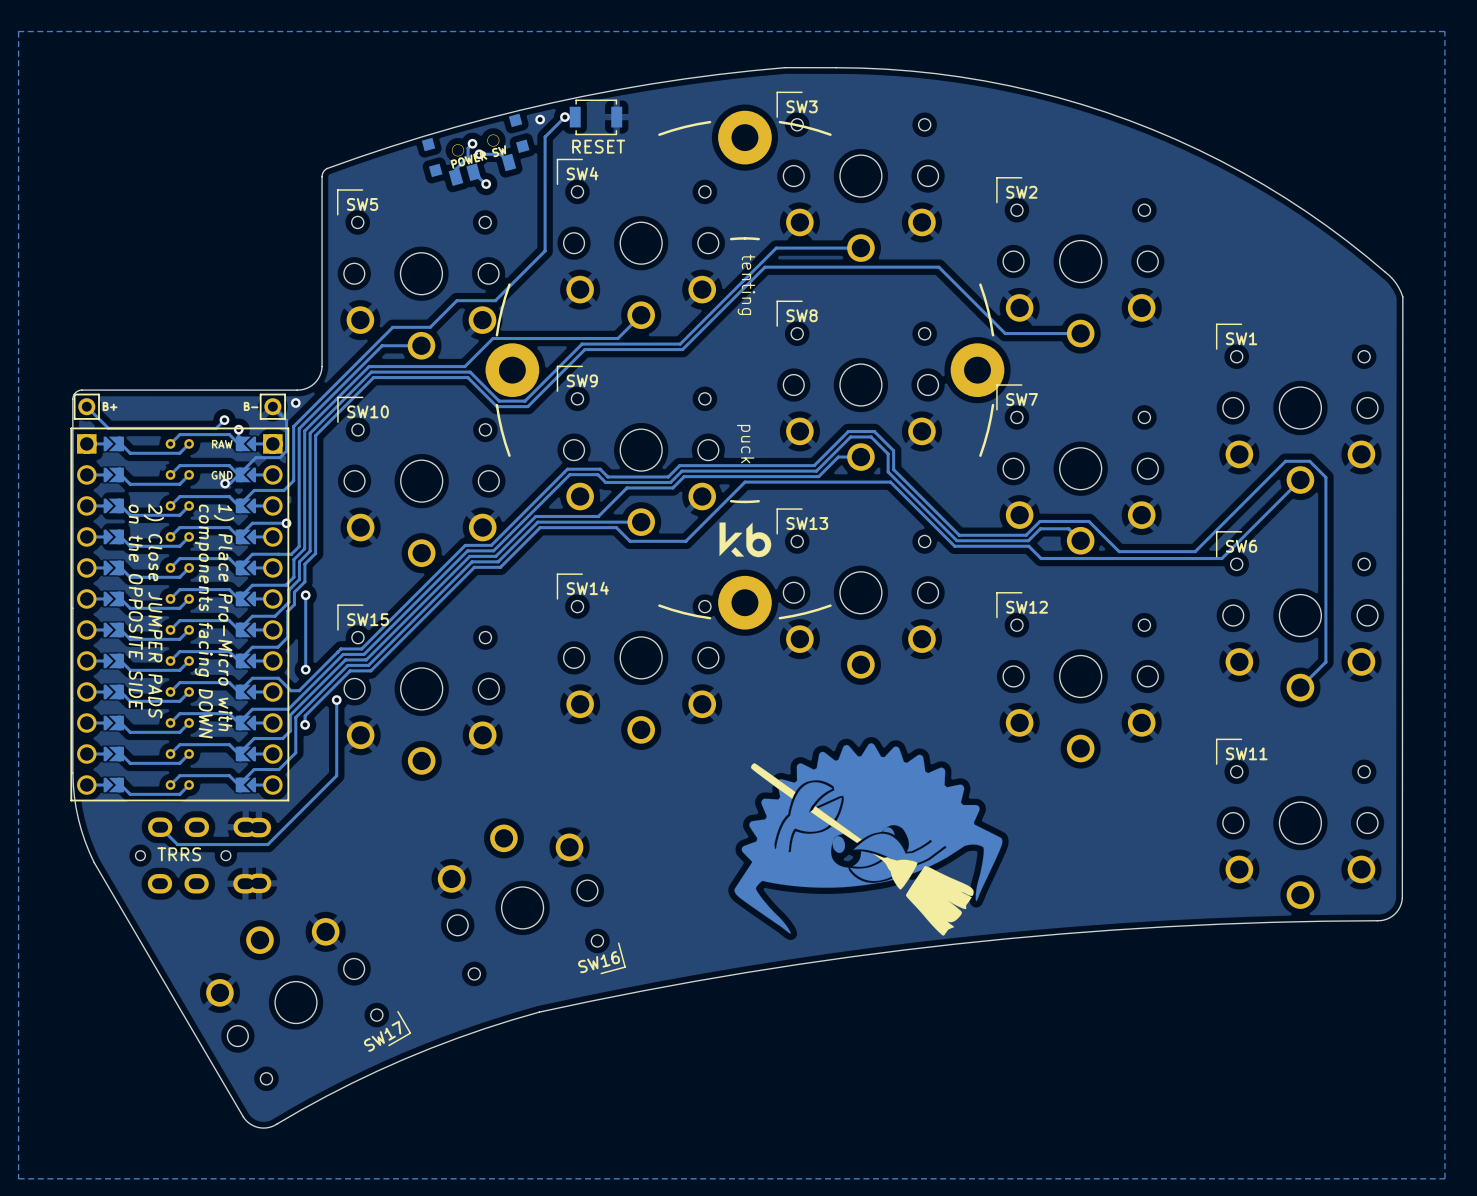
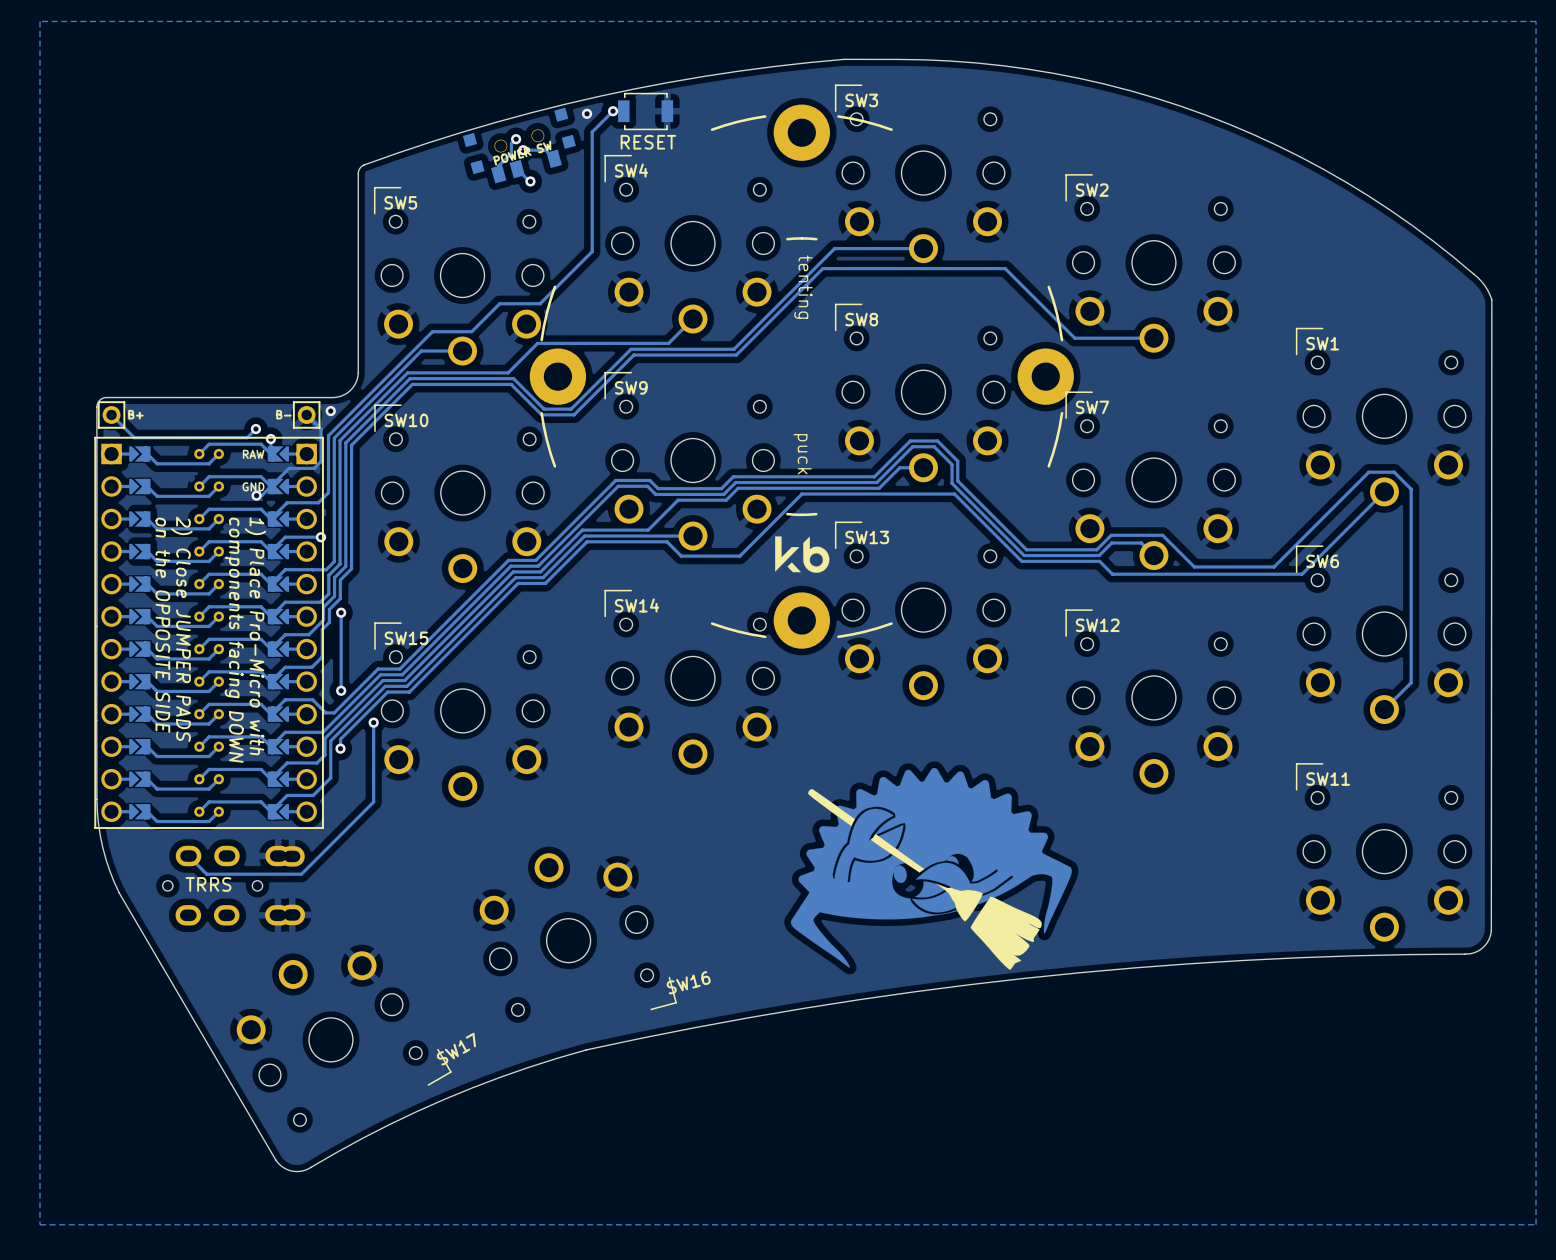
SW16 name position: SW16 (599, 962) -> SW16 (688, 982)
SW17 name position: SW17 (382, 1036) -> SW17 (456, 1049)

